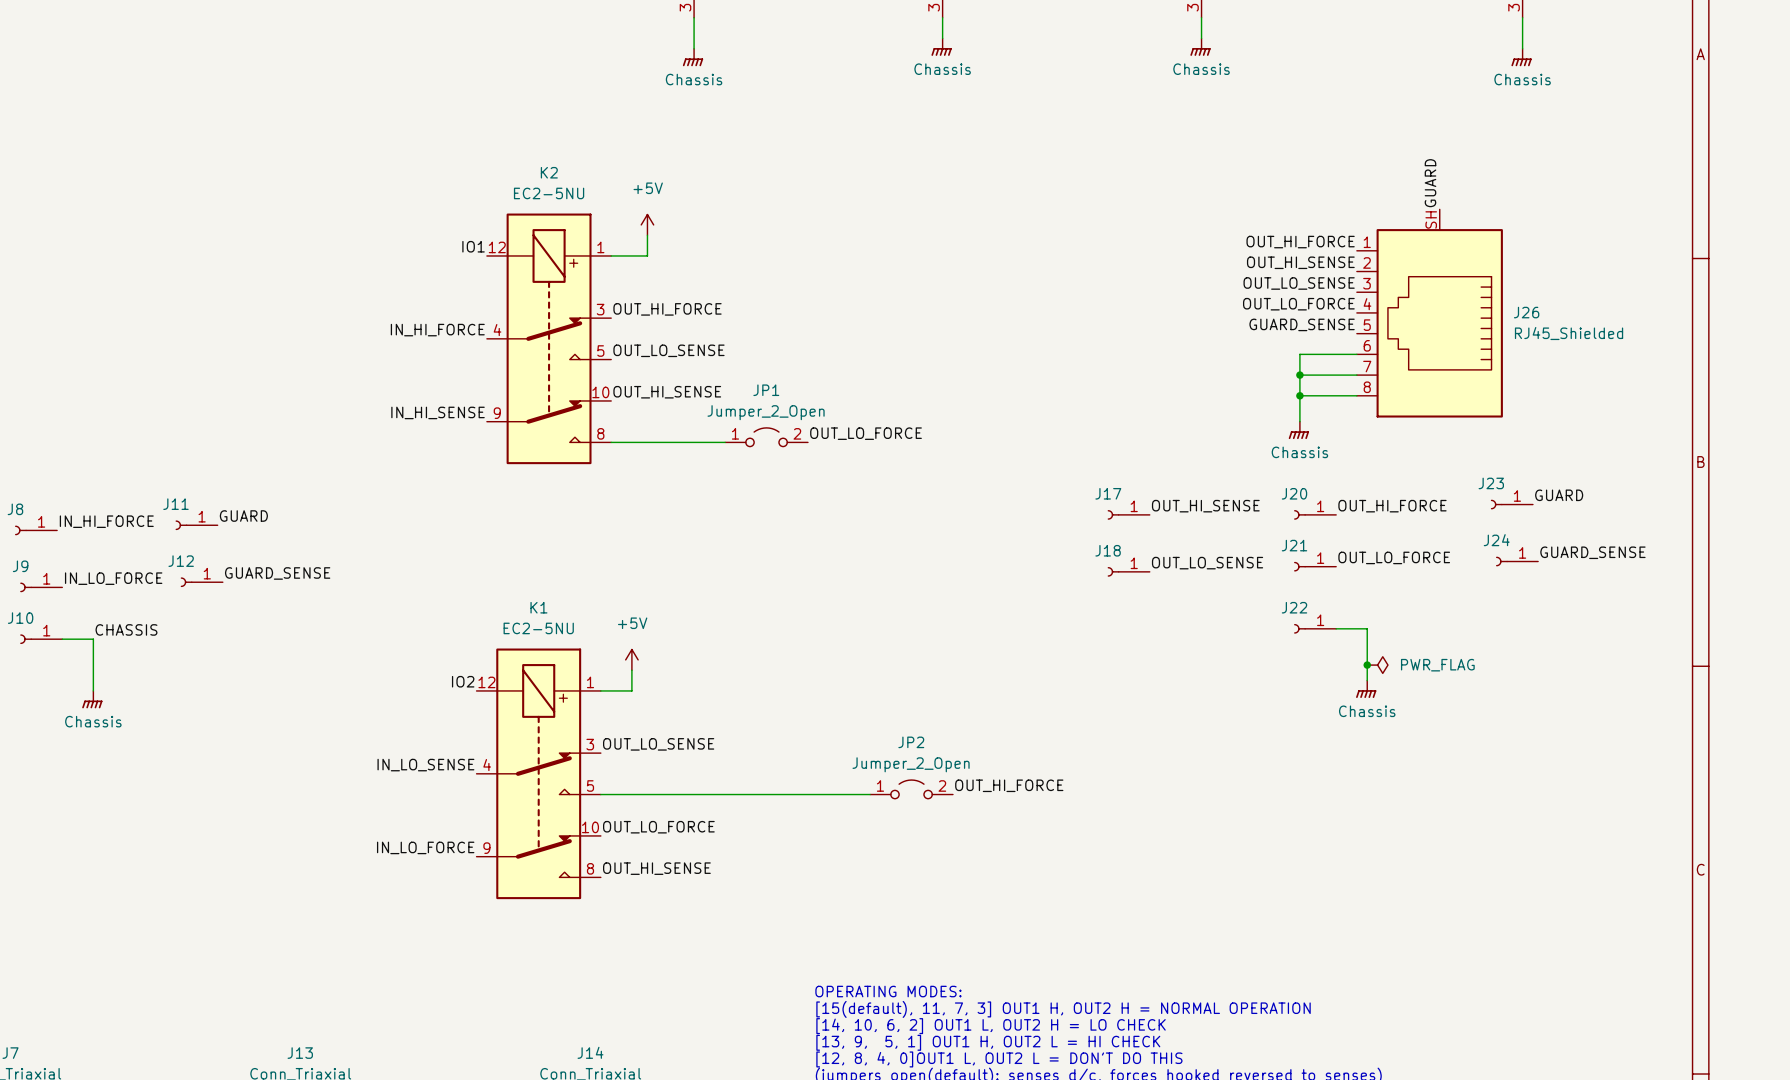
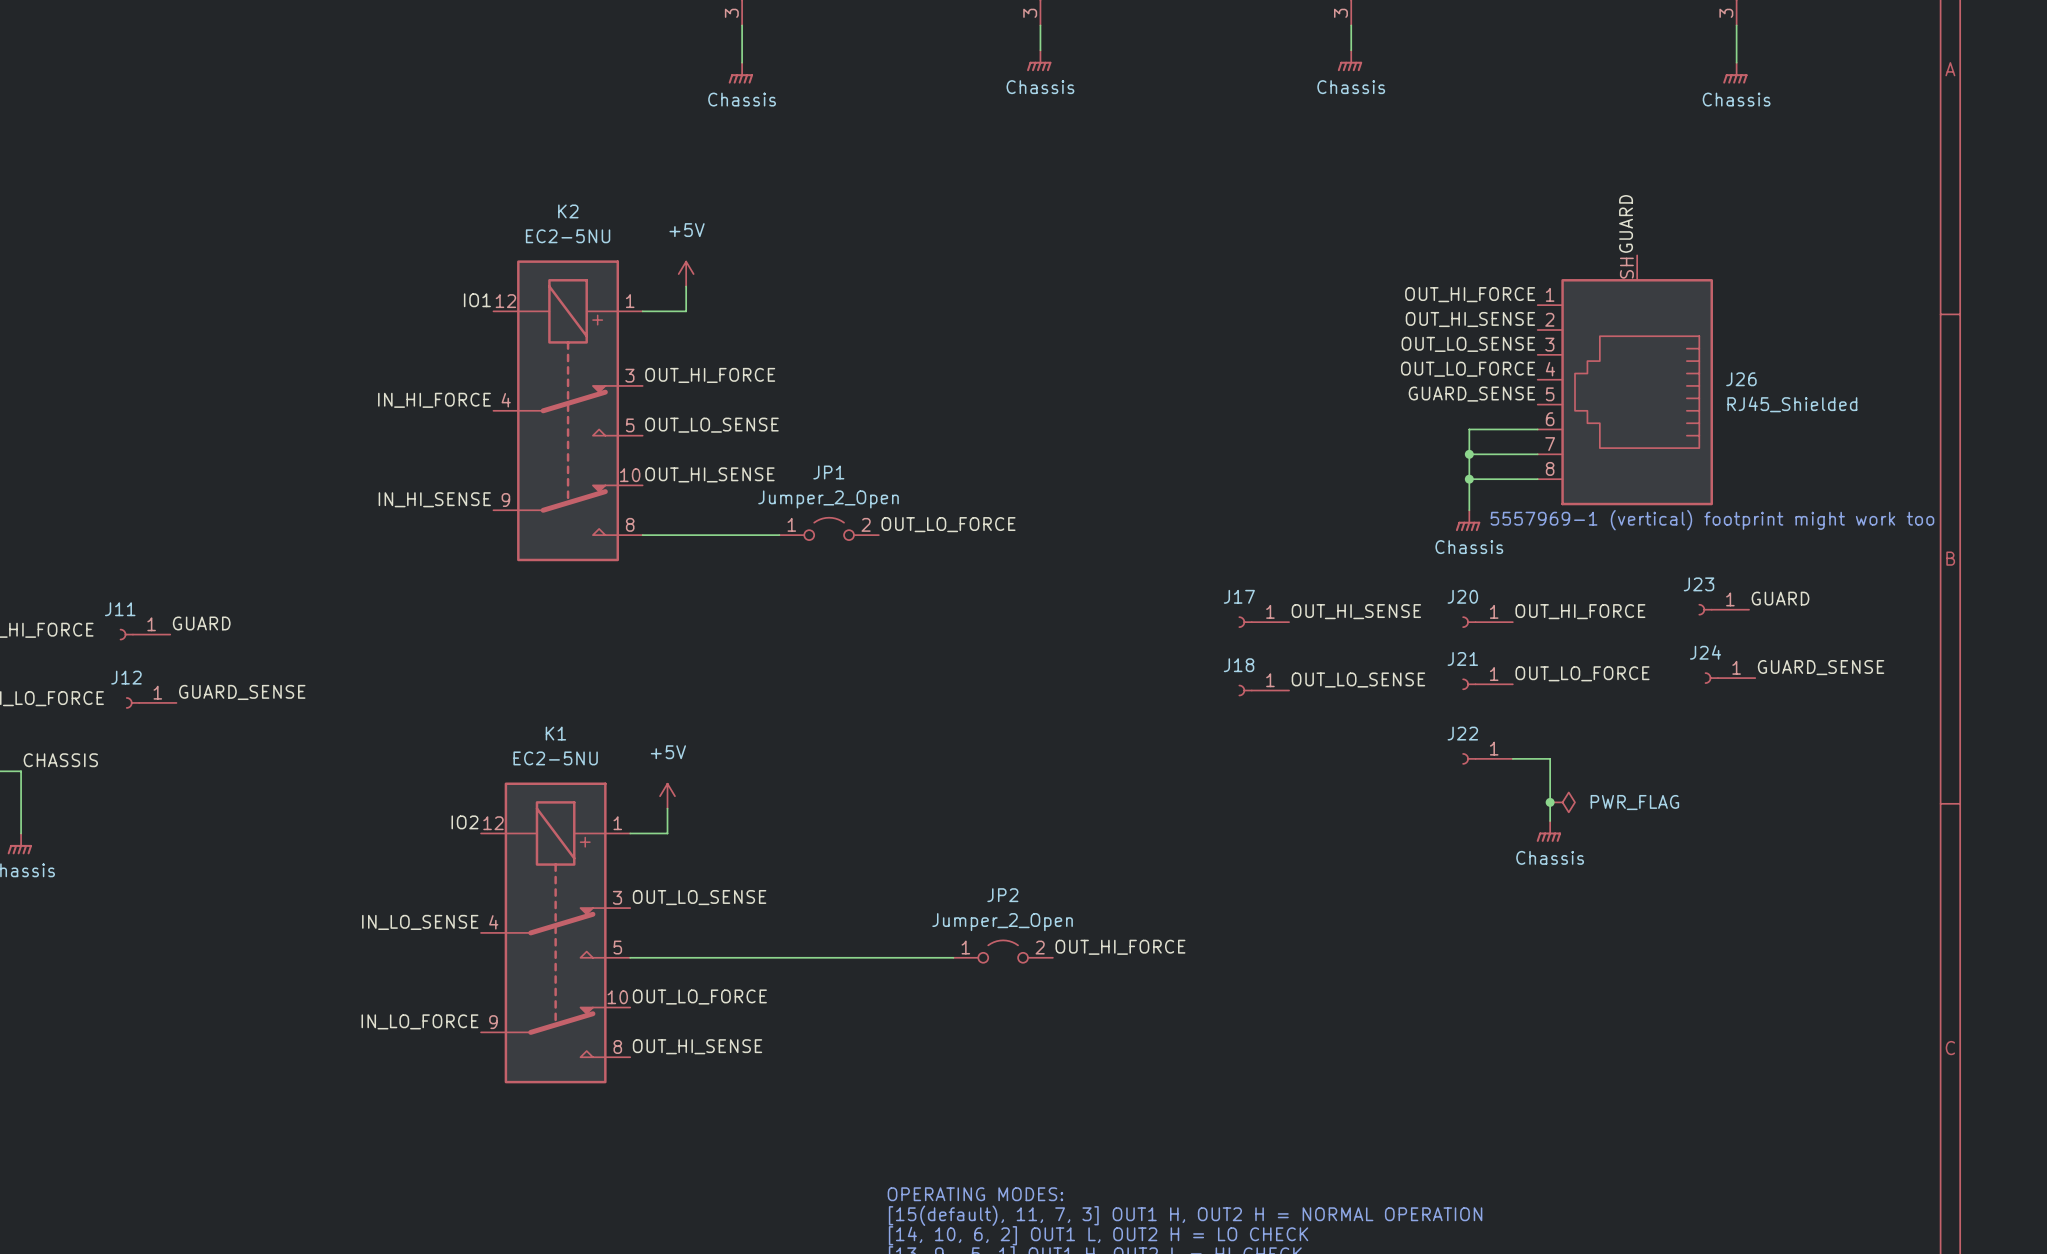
text: none -> 5557969-1 (vertical) footprint might work too (1712, 520)

